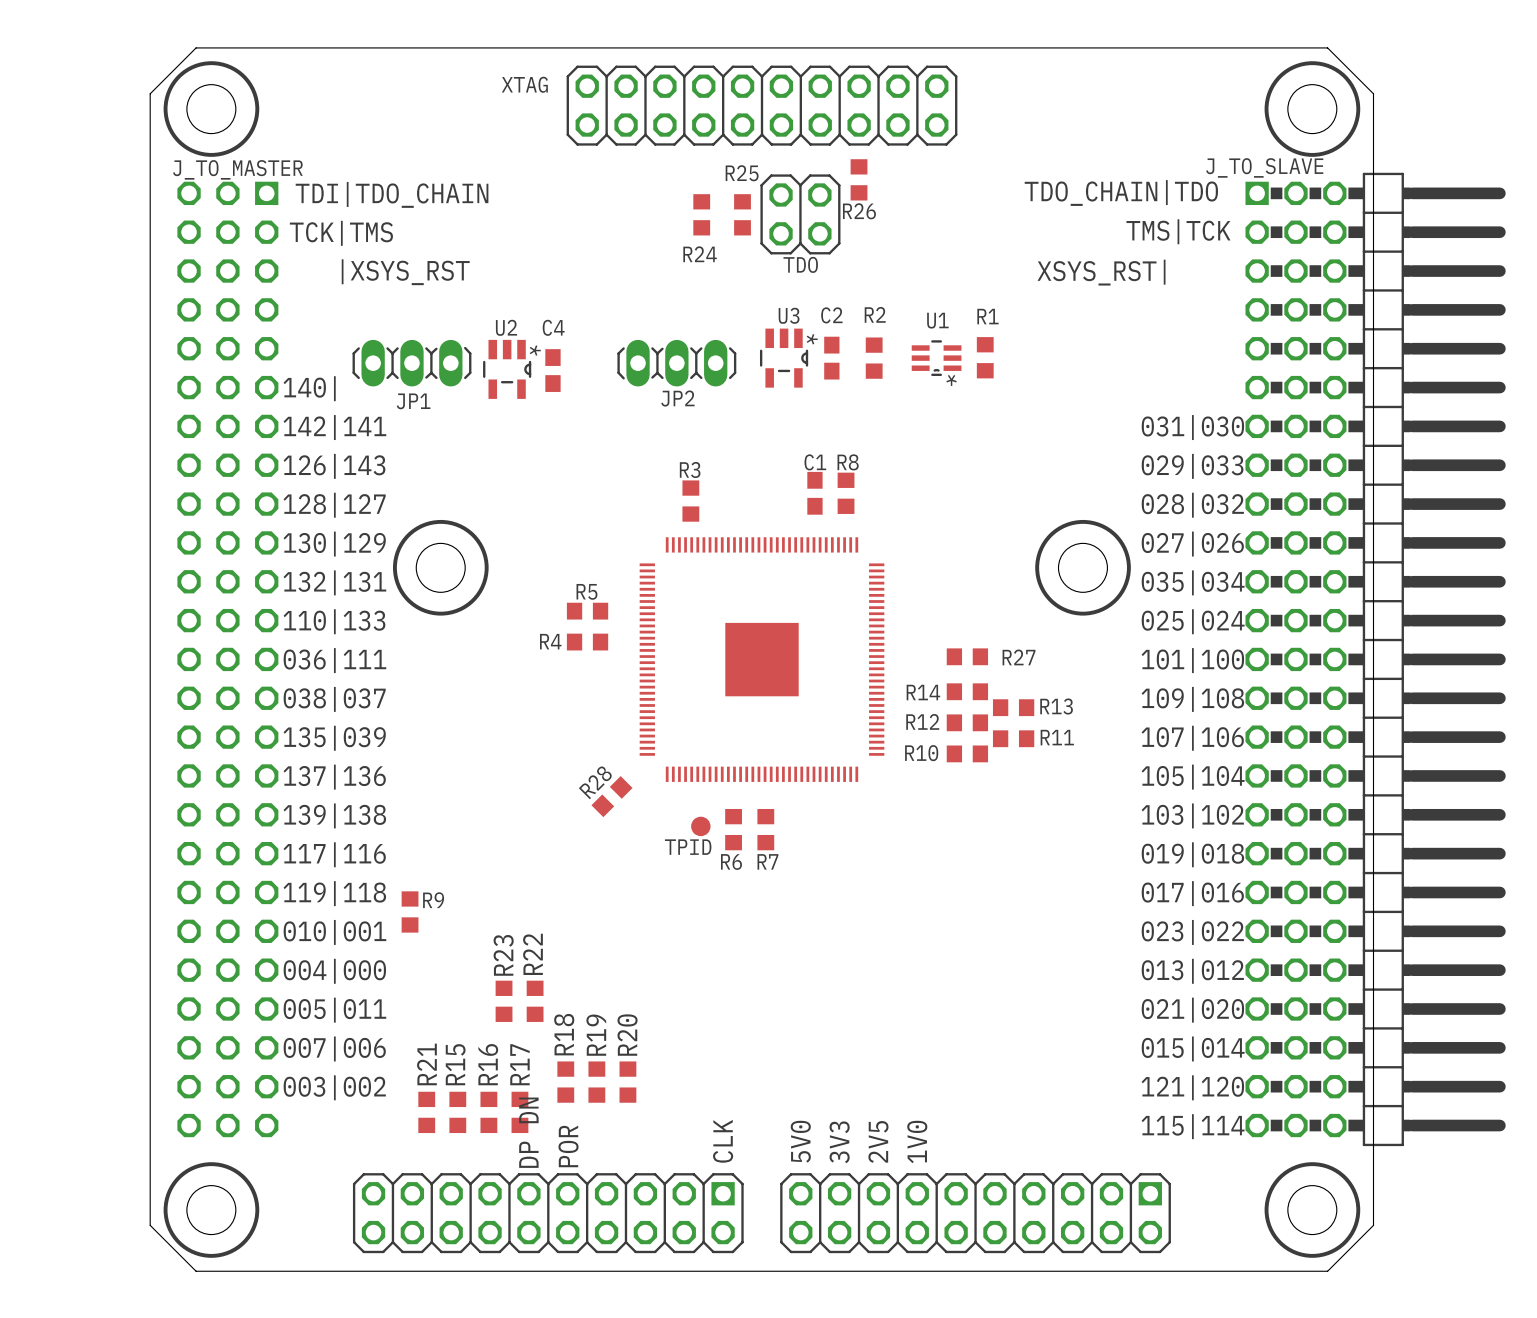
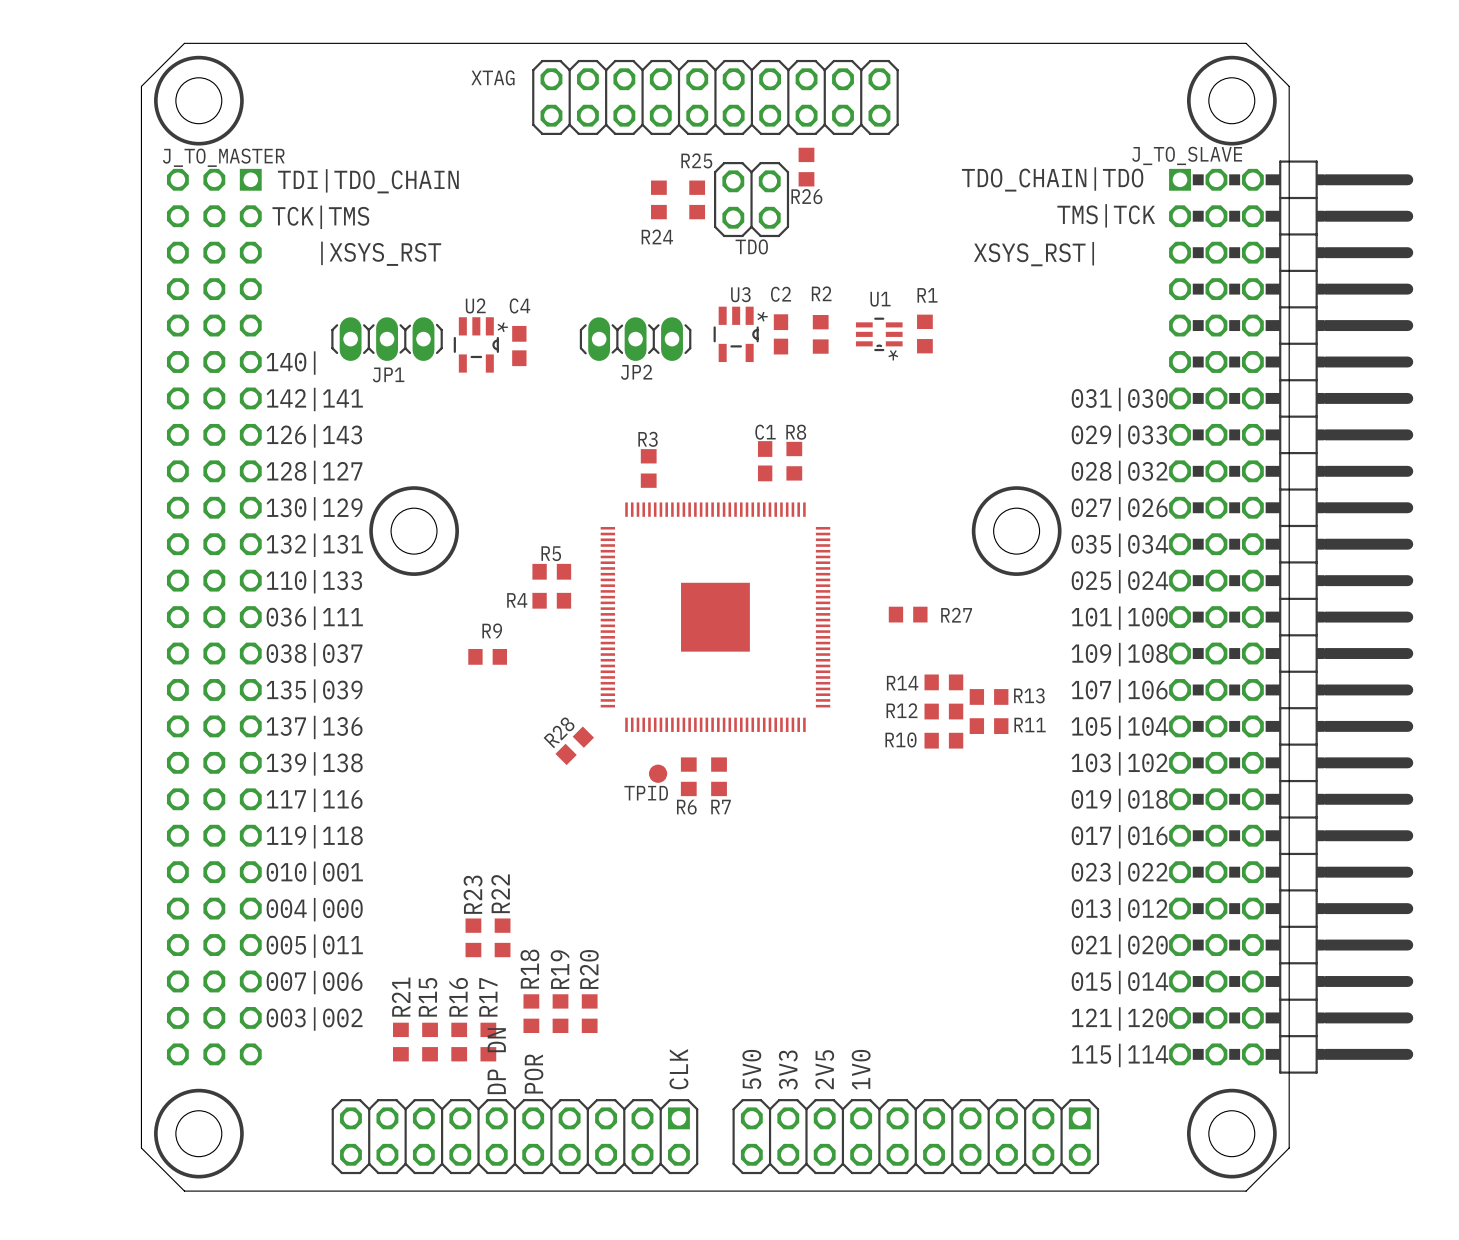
R14 position: (967, 691) -> (943, 682)
R13 position: (1013, 707) -> (989, 696)
R12 position: (967, 722) -> (943, 711)
R11 position: (1013, 738) -> (989, 726)
R10 position: (967, 753) -> (943, 740)
R9 rotation: 0° (410, 911) -> 90° clockwise (487, 656)
R9 position: (410, 911) -> (487, 656)

